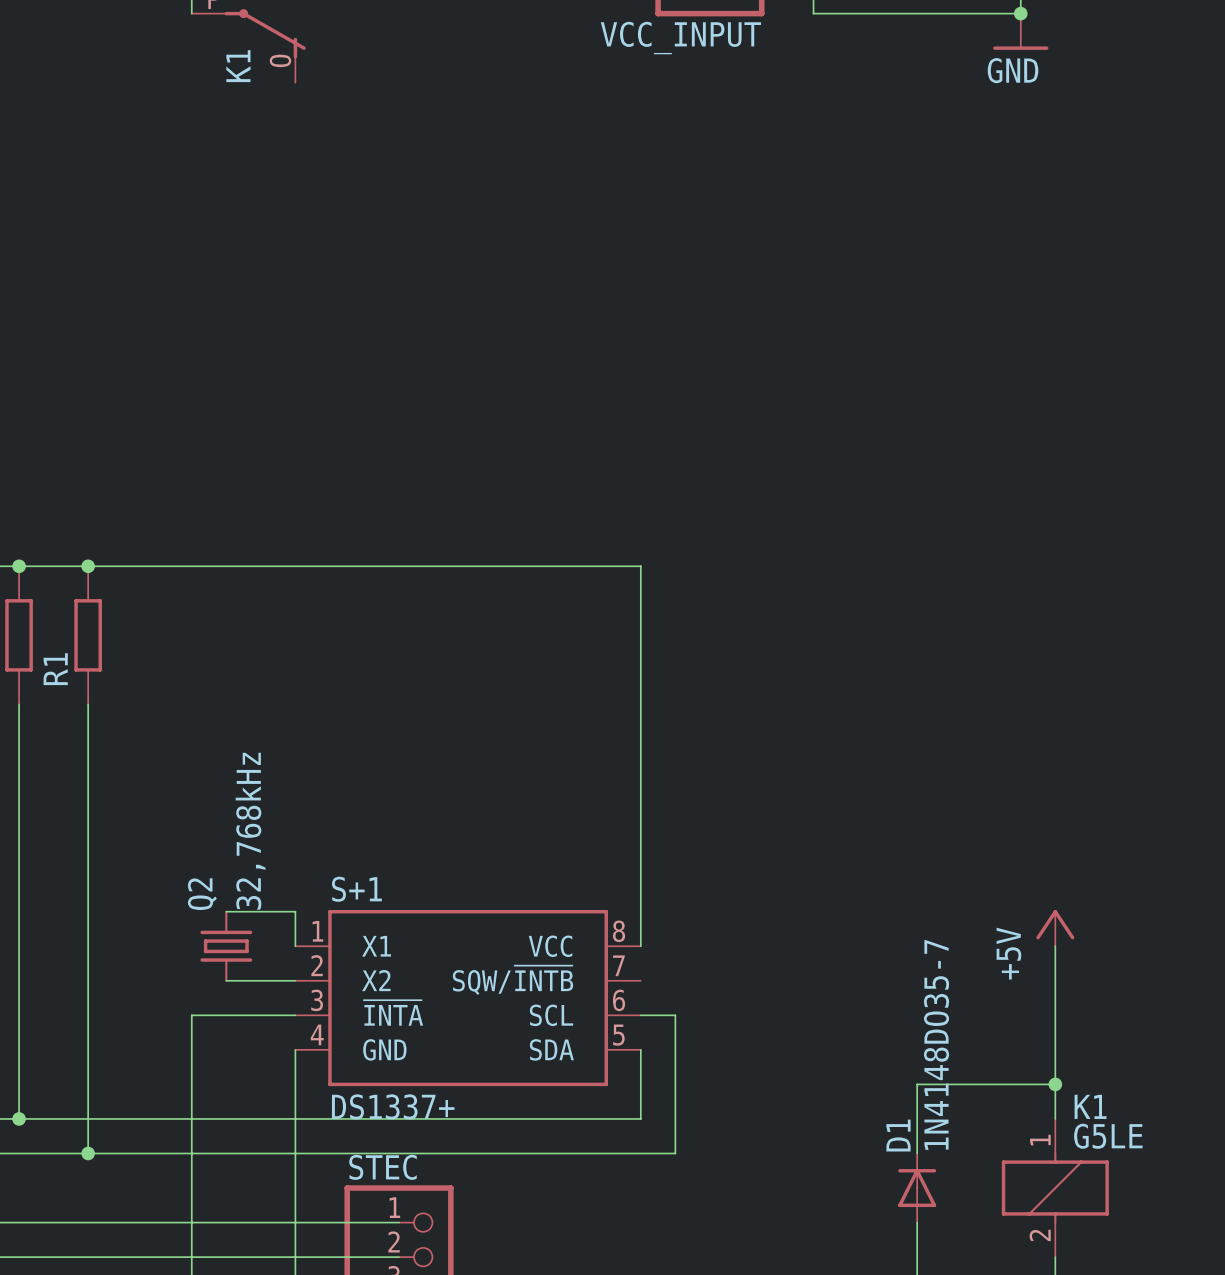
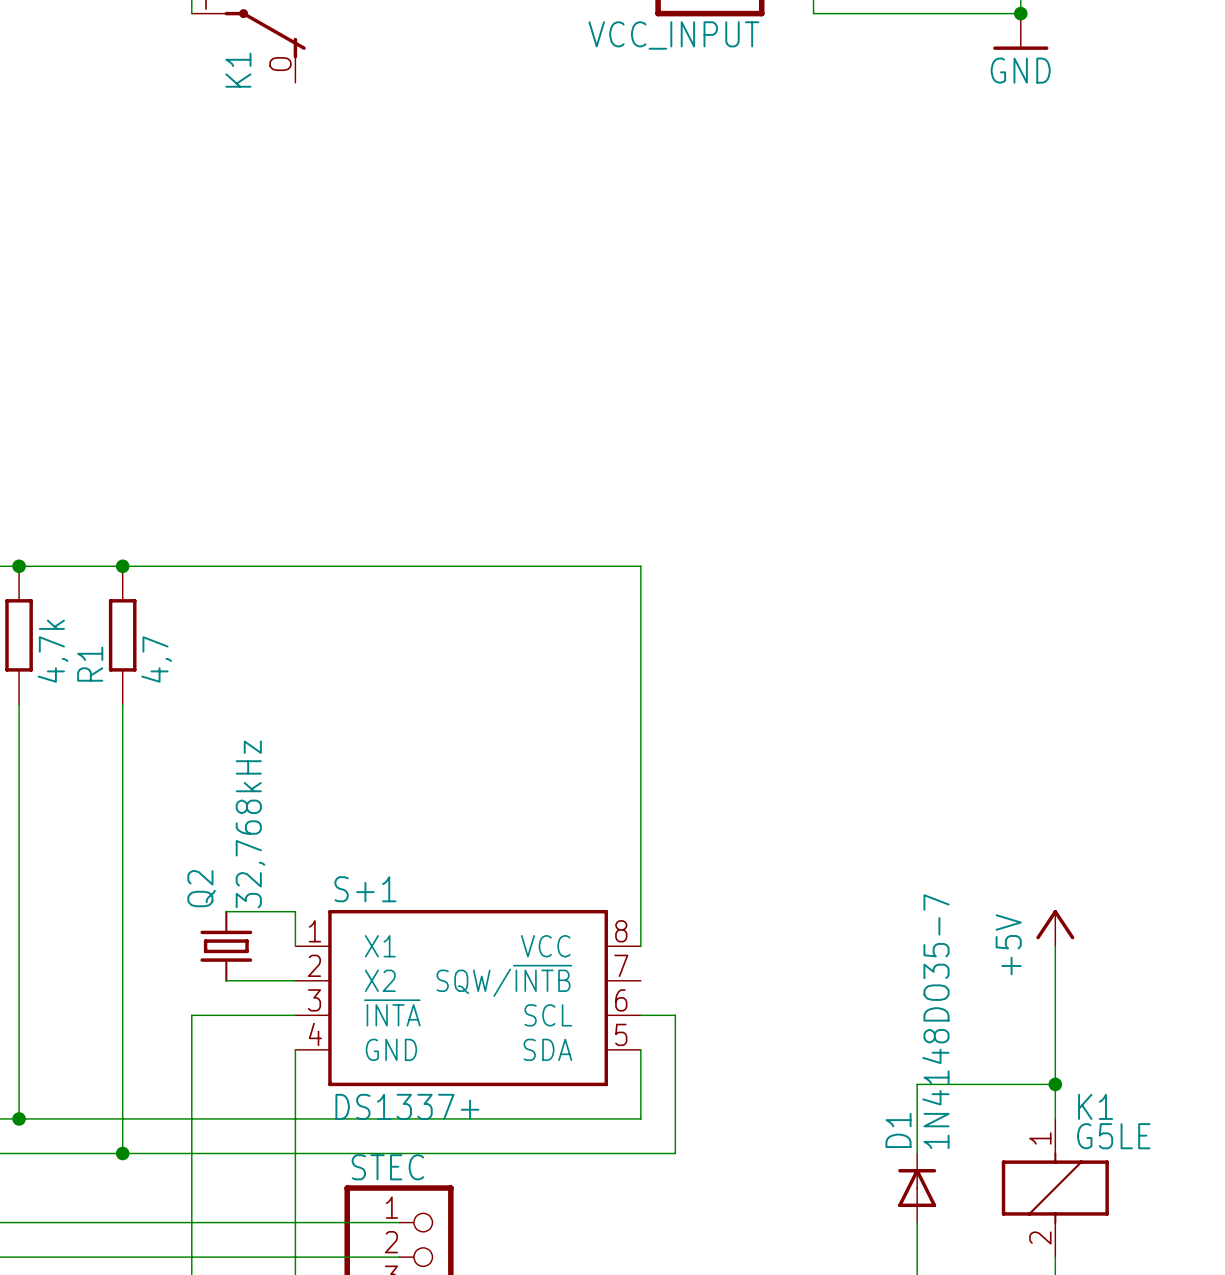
junction position: (88, 566) -> (122, 566)
R1 position: (88, 635) -> (122, 635)
part value: none -> 4,7k (53, 651)
R1 value: none -> 4,7 (156, 659)
wire: (88, 704) (88, 1153) -> (122, 704) (122, 1153)
junction position: (88, 1153) -> (122, 1153)

